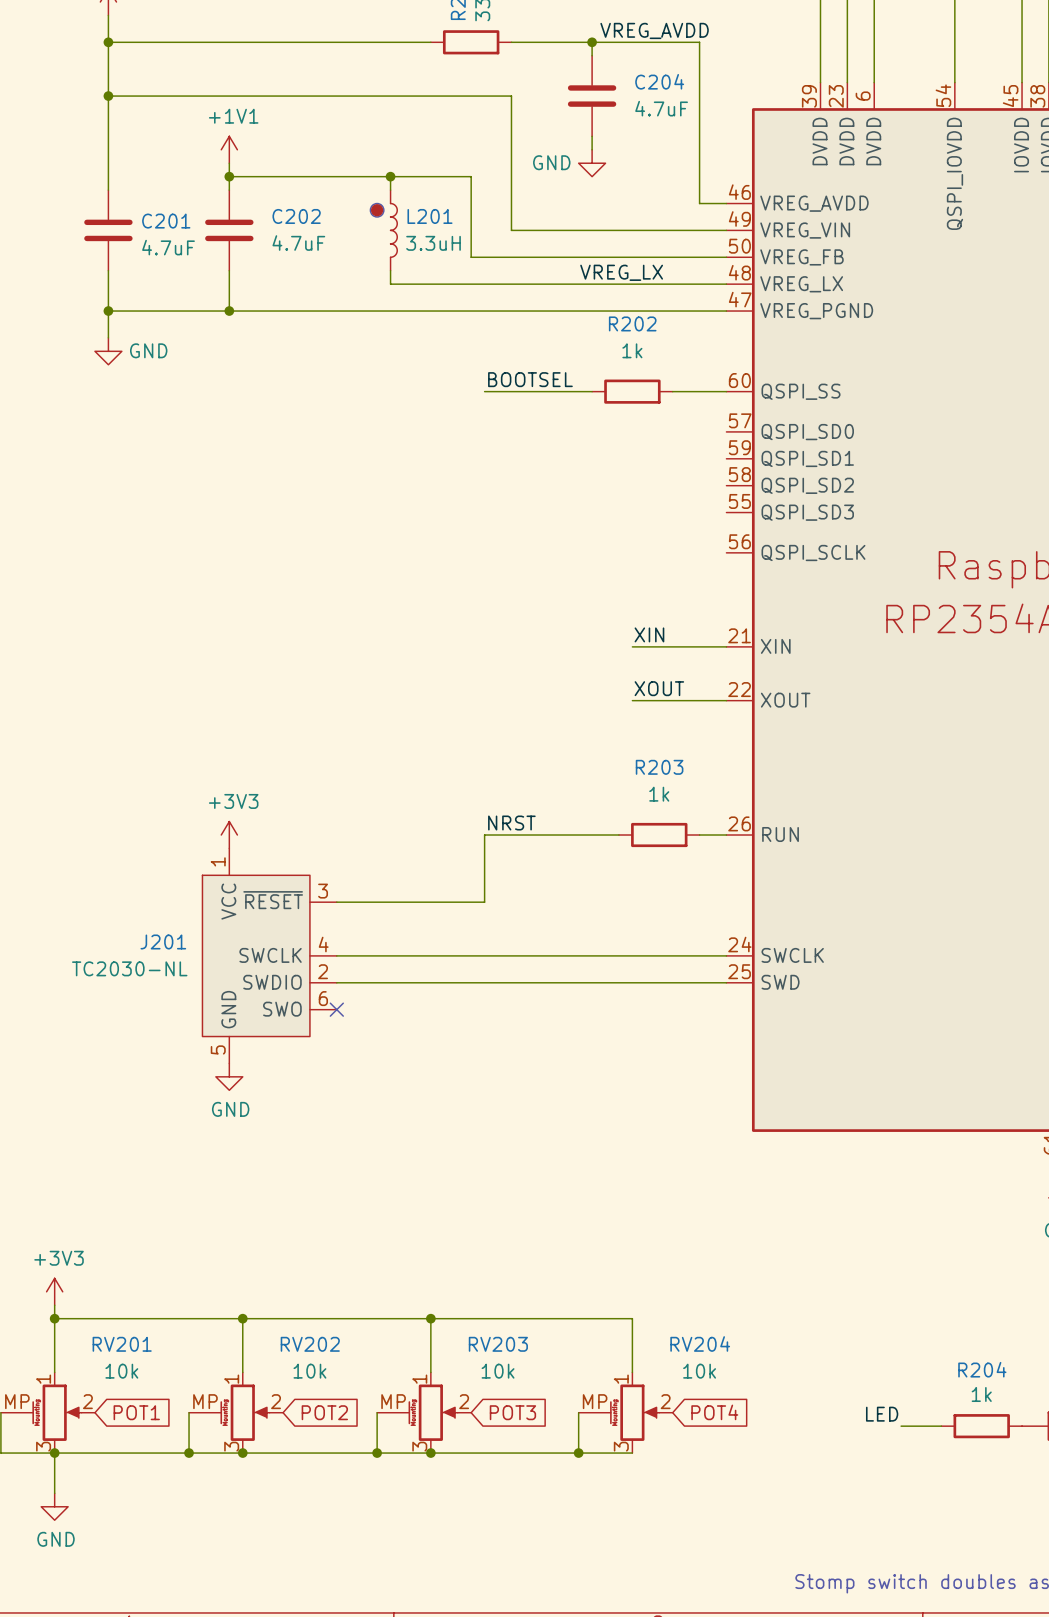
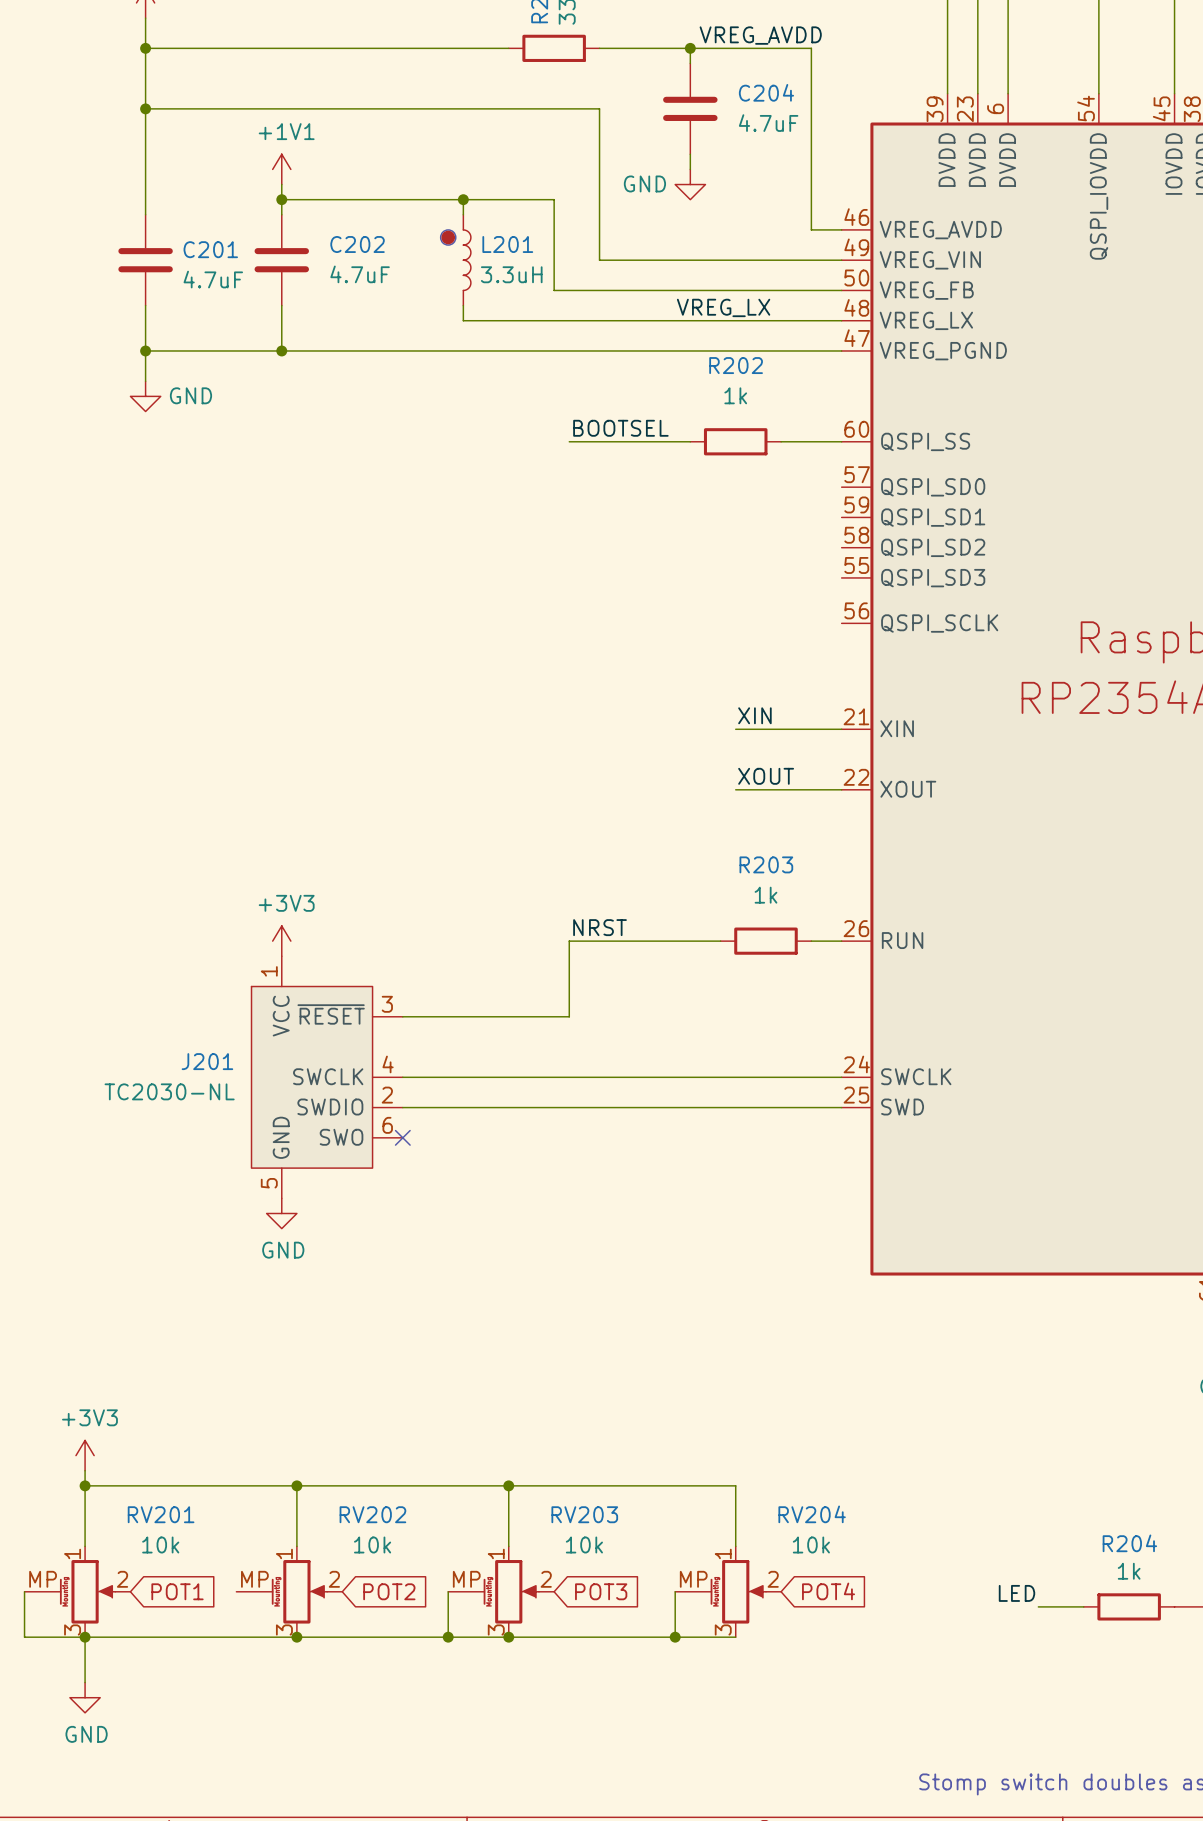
wire: (189, 1412) (189, 1453) -> none
junction: (189, 1453) -> none

